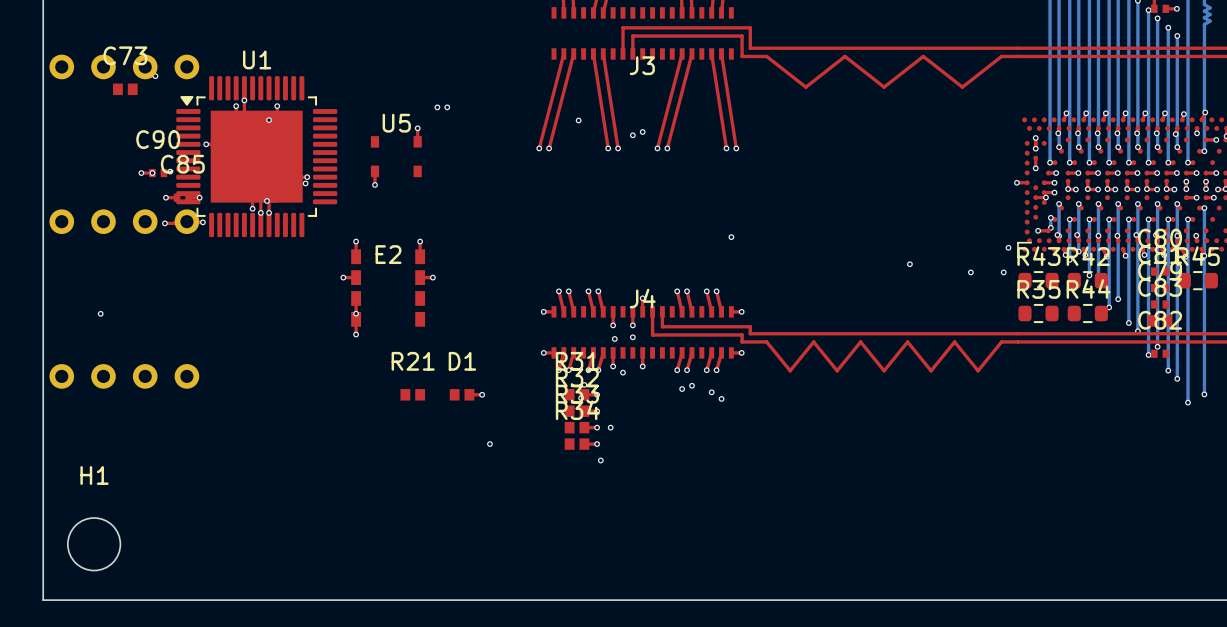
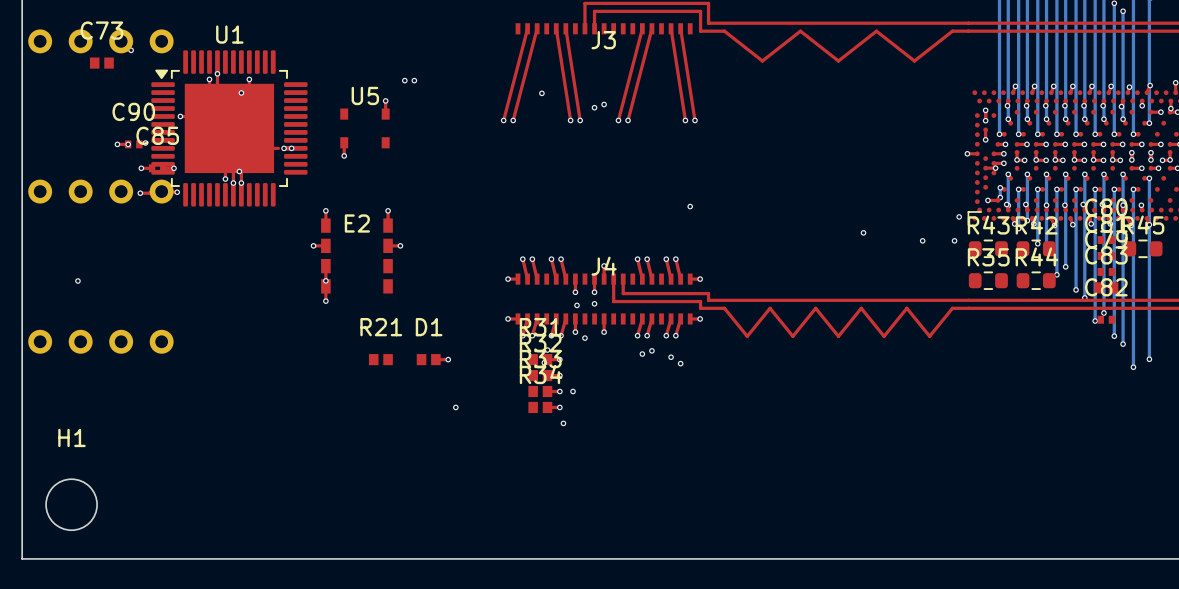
via: (307, 177) -> none
via: none -> (284, 148)
via: none -> (291, 148)
via: (305, 183) -> none

